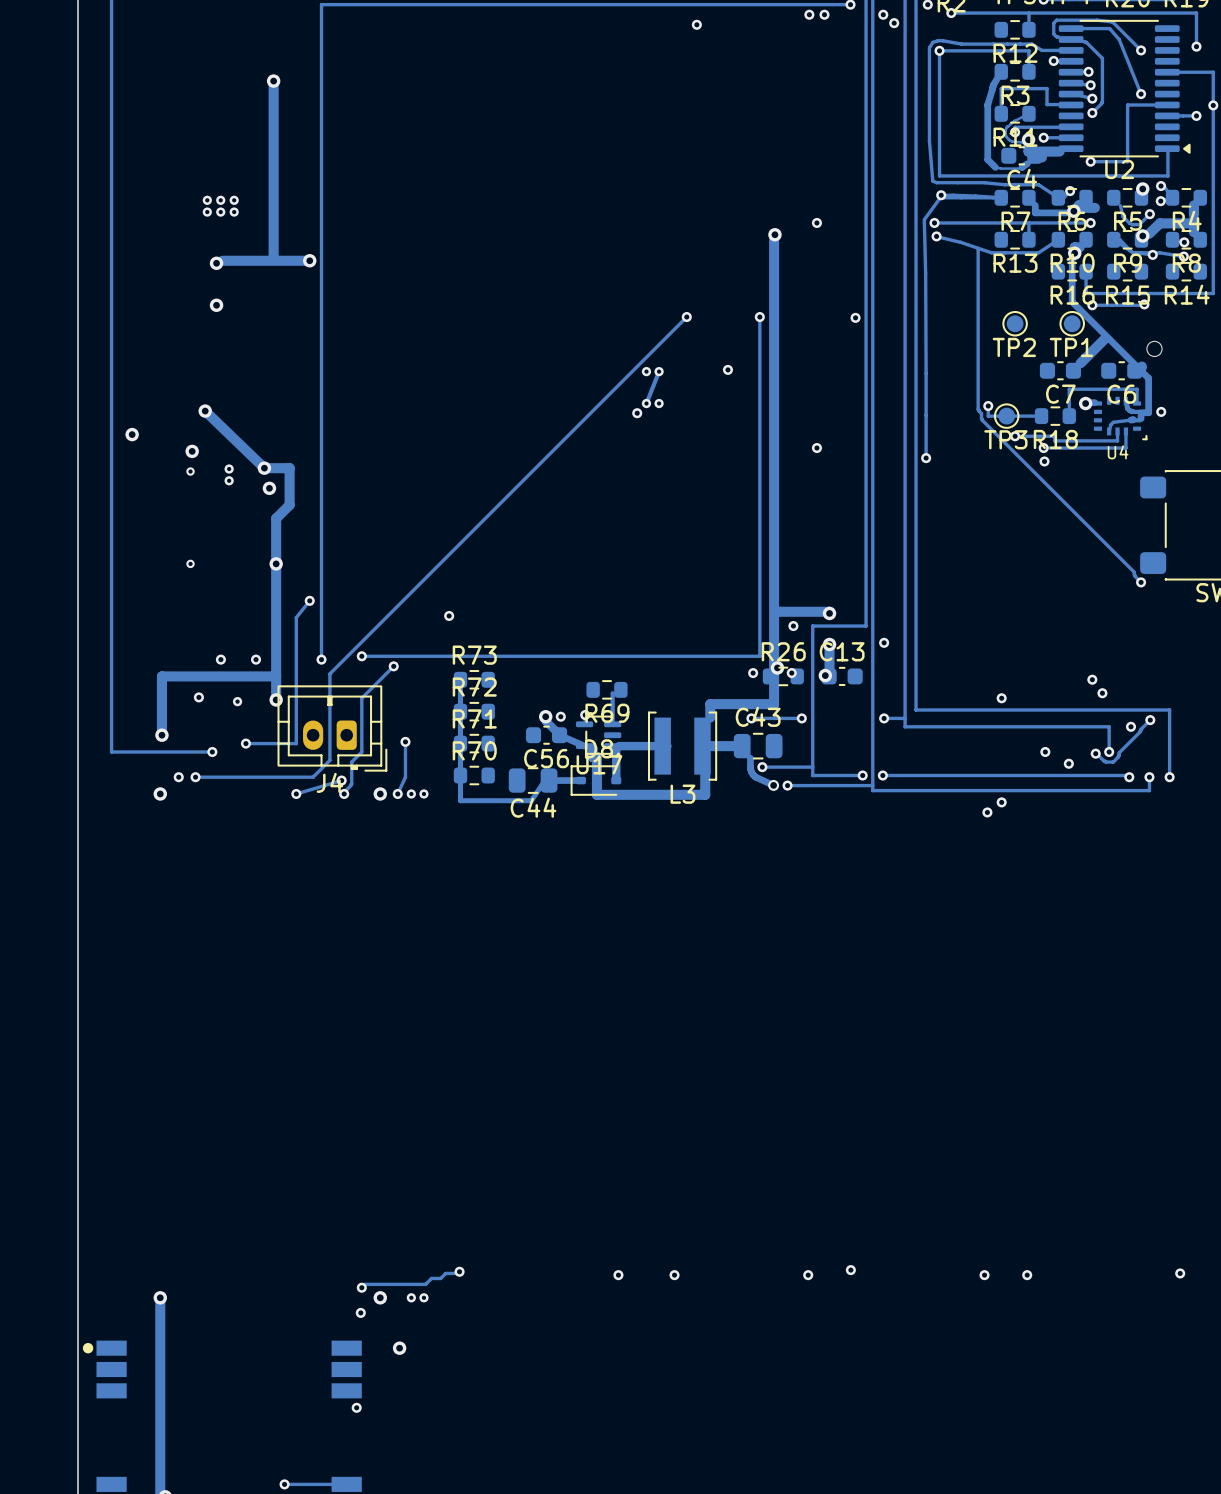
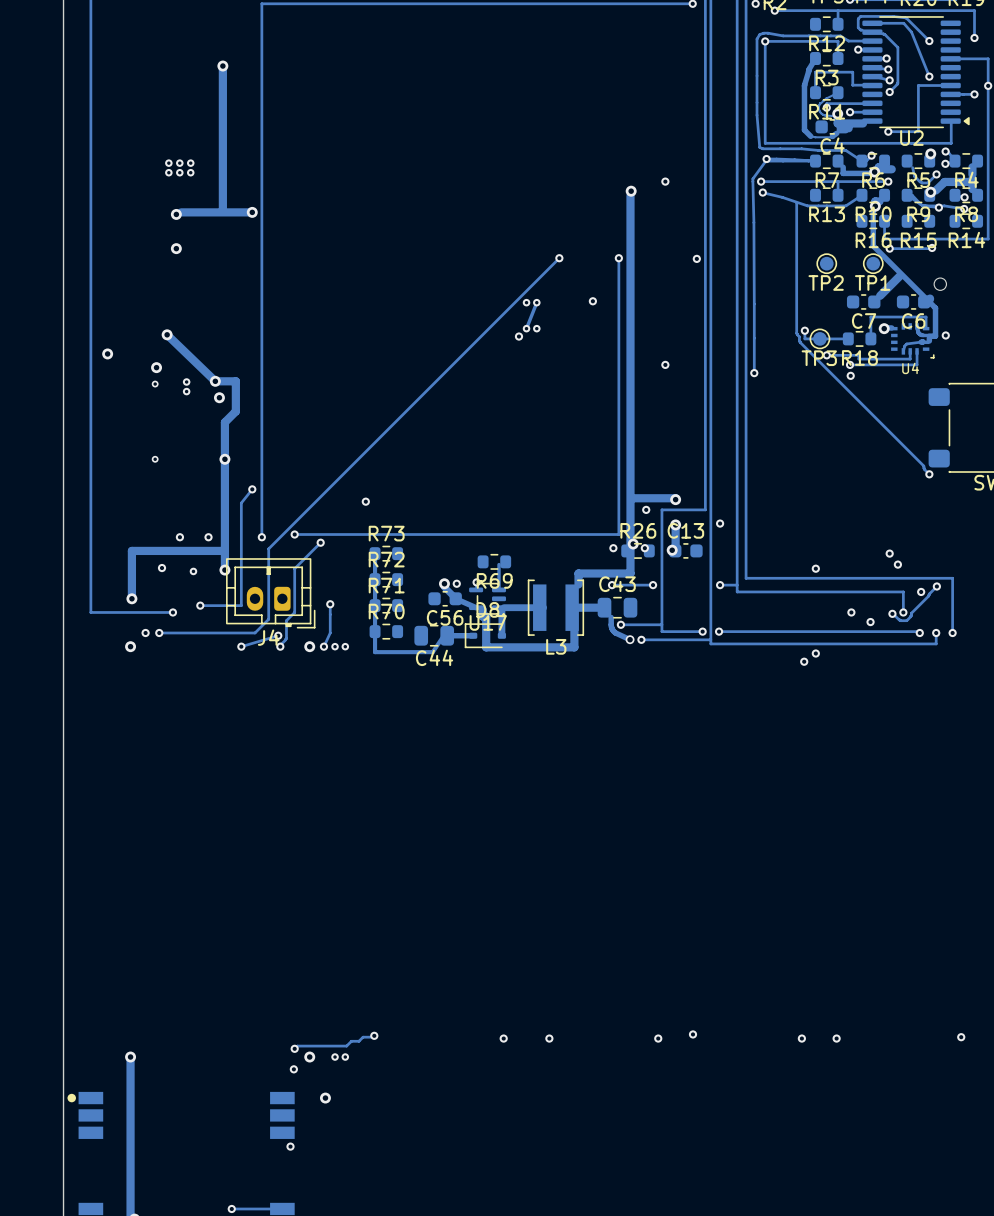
via: (809, 14) -> none
via: (824, 14) -> none
via: (883, 14) -> none
via: (894, 23) -> none
via: (696, 24) -> none

